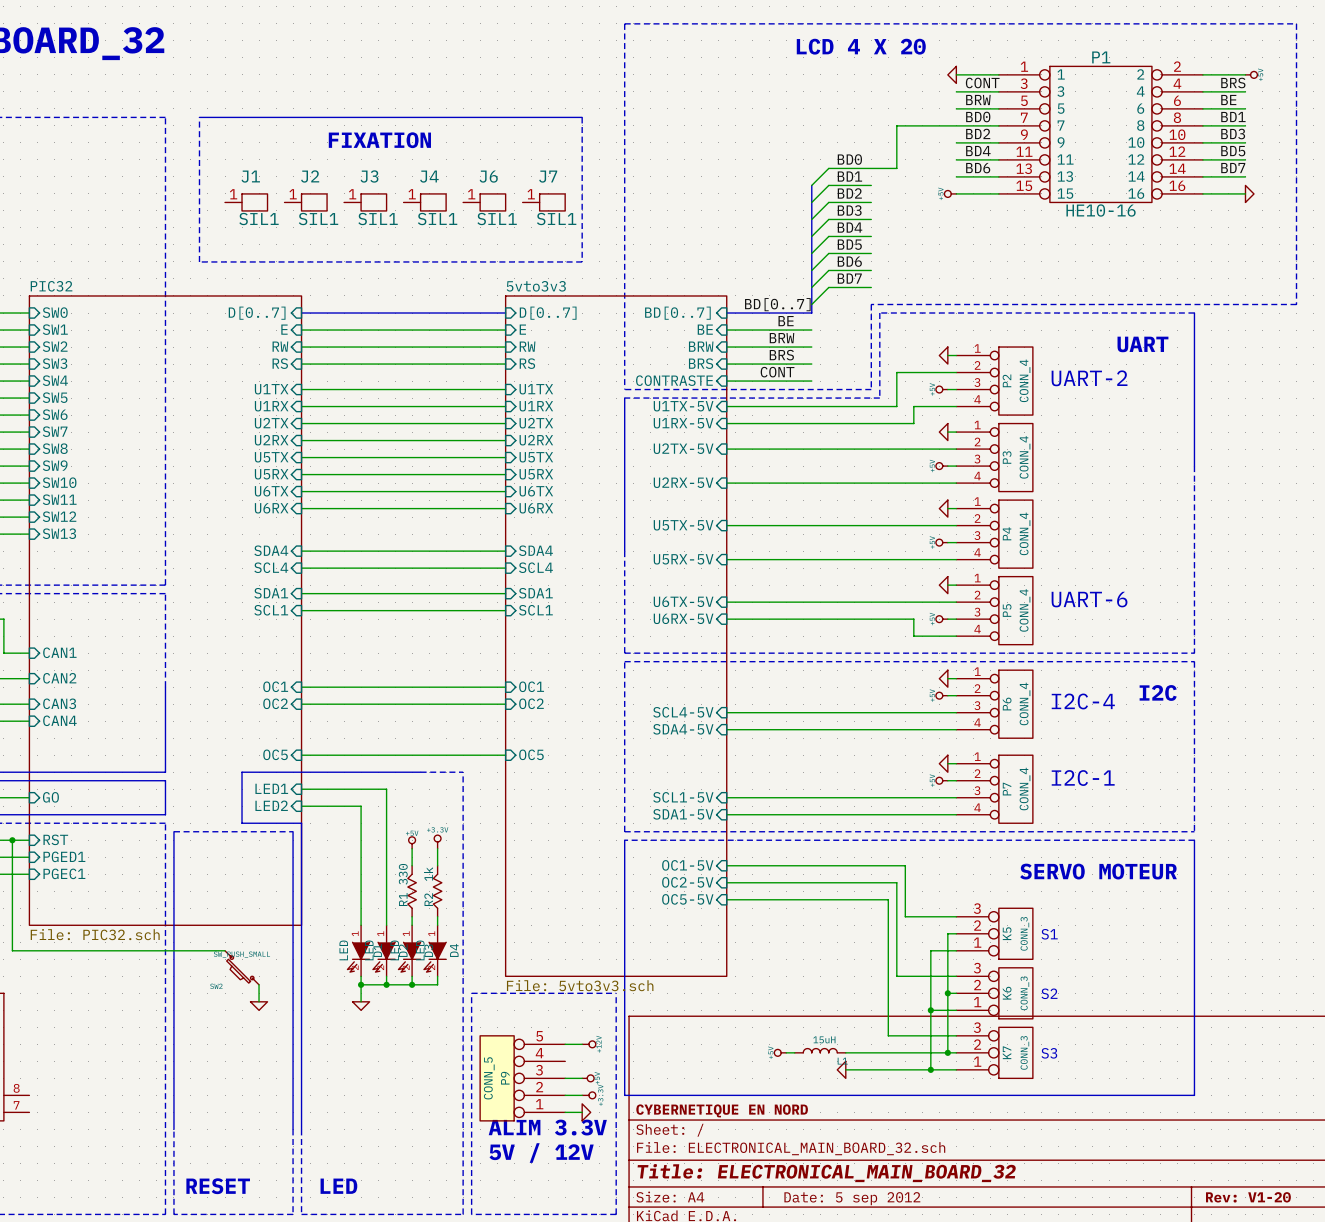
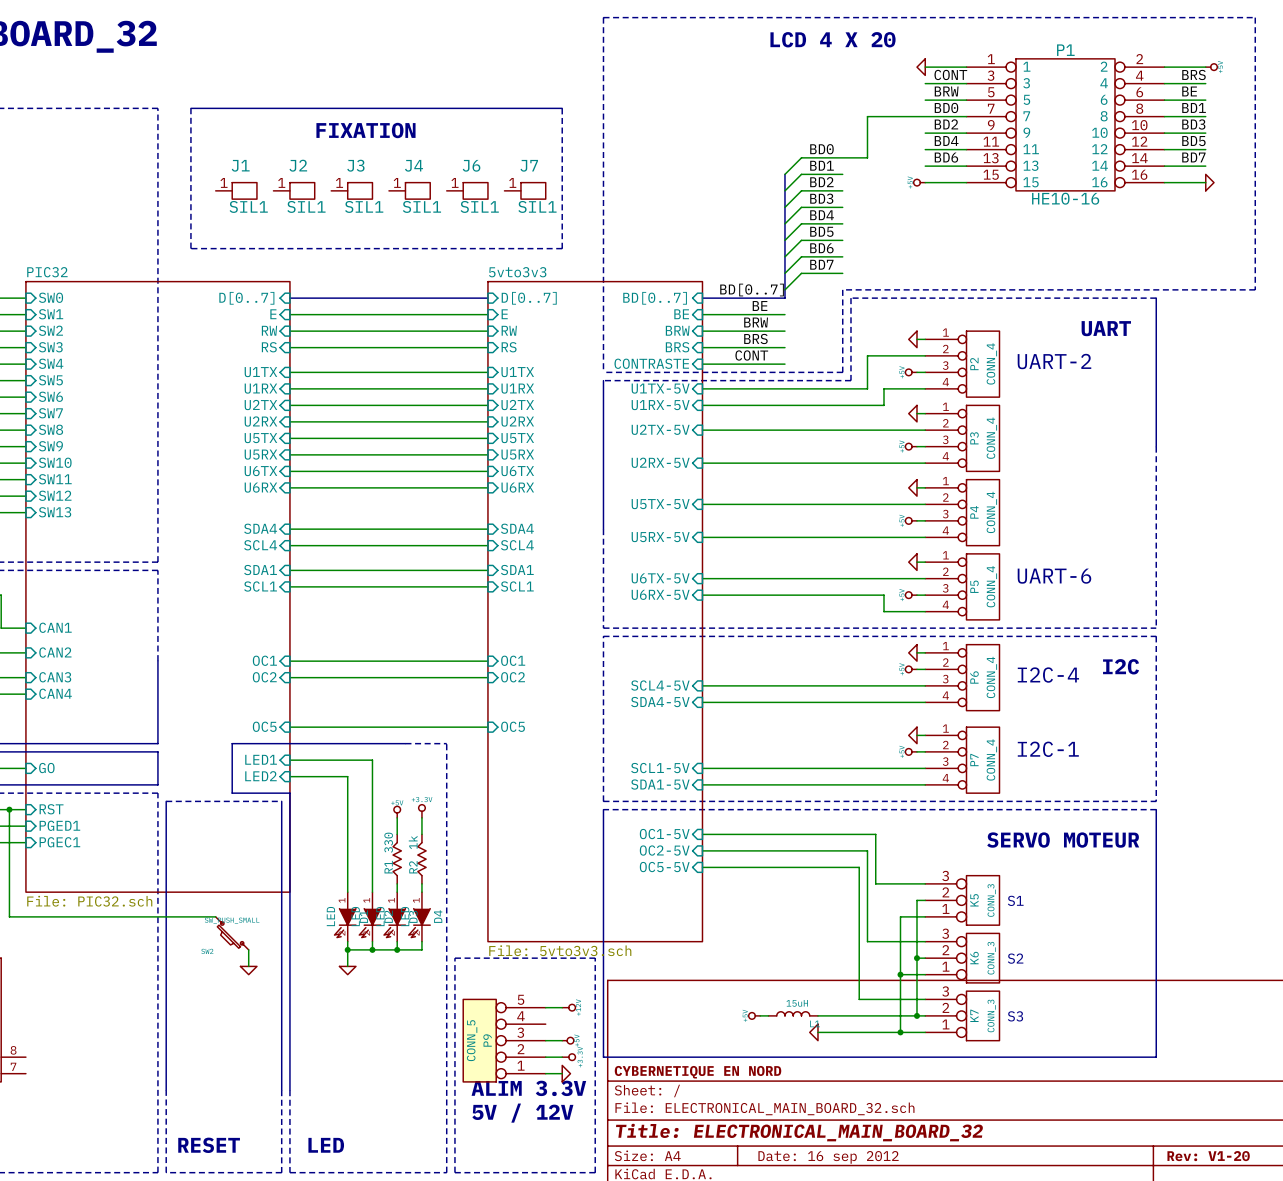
title block: Date: 5 sep 2012 (852, 1198) -> Date: 16 sep 2012 (828, 1157)

